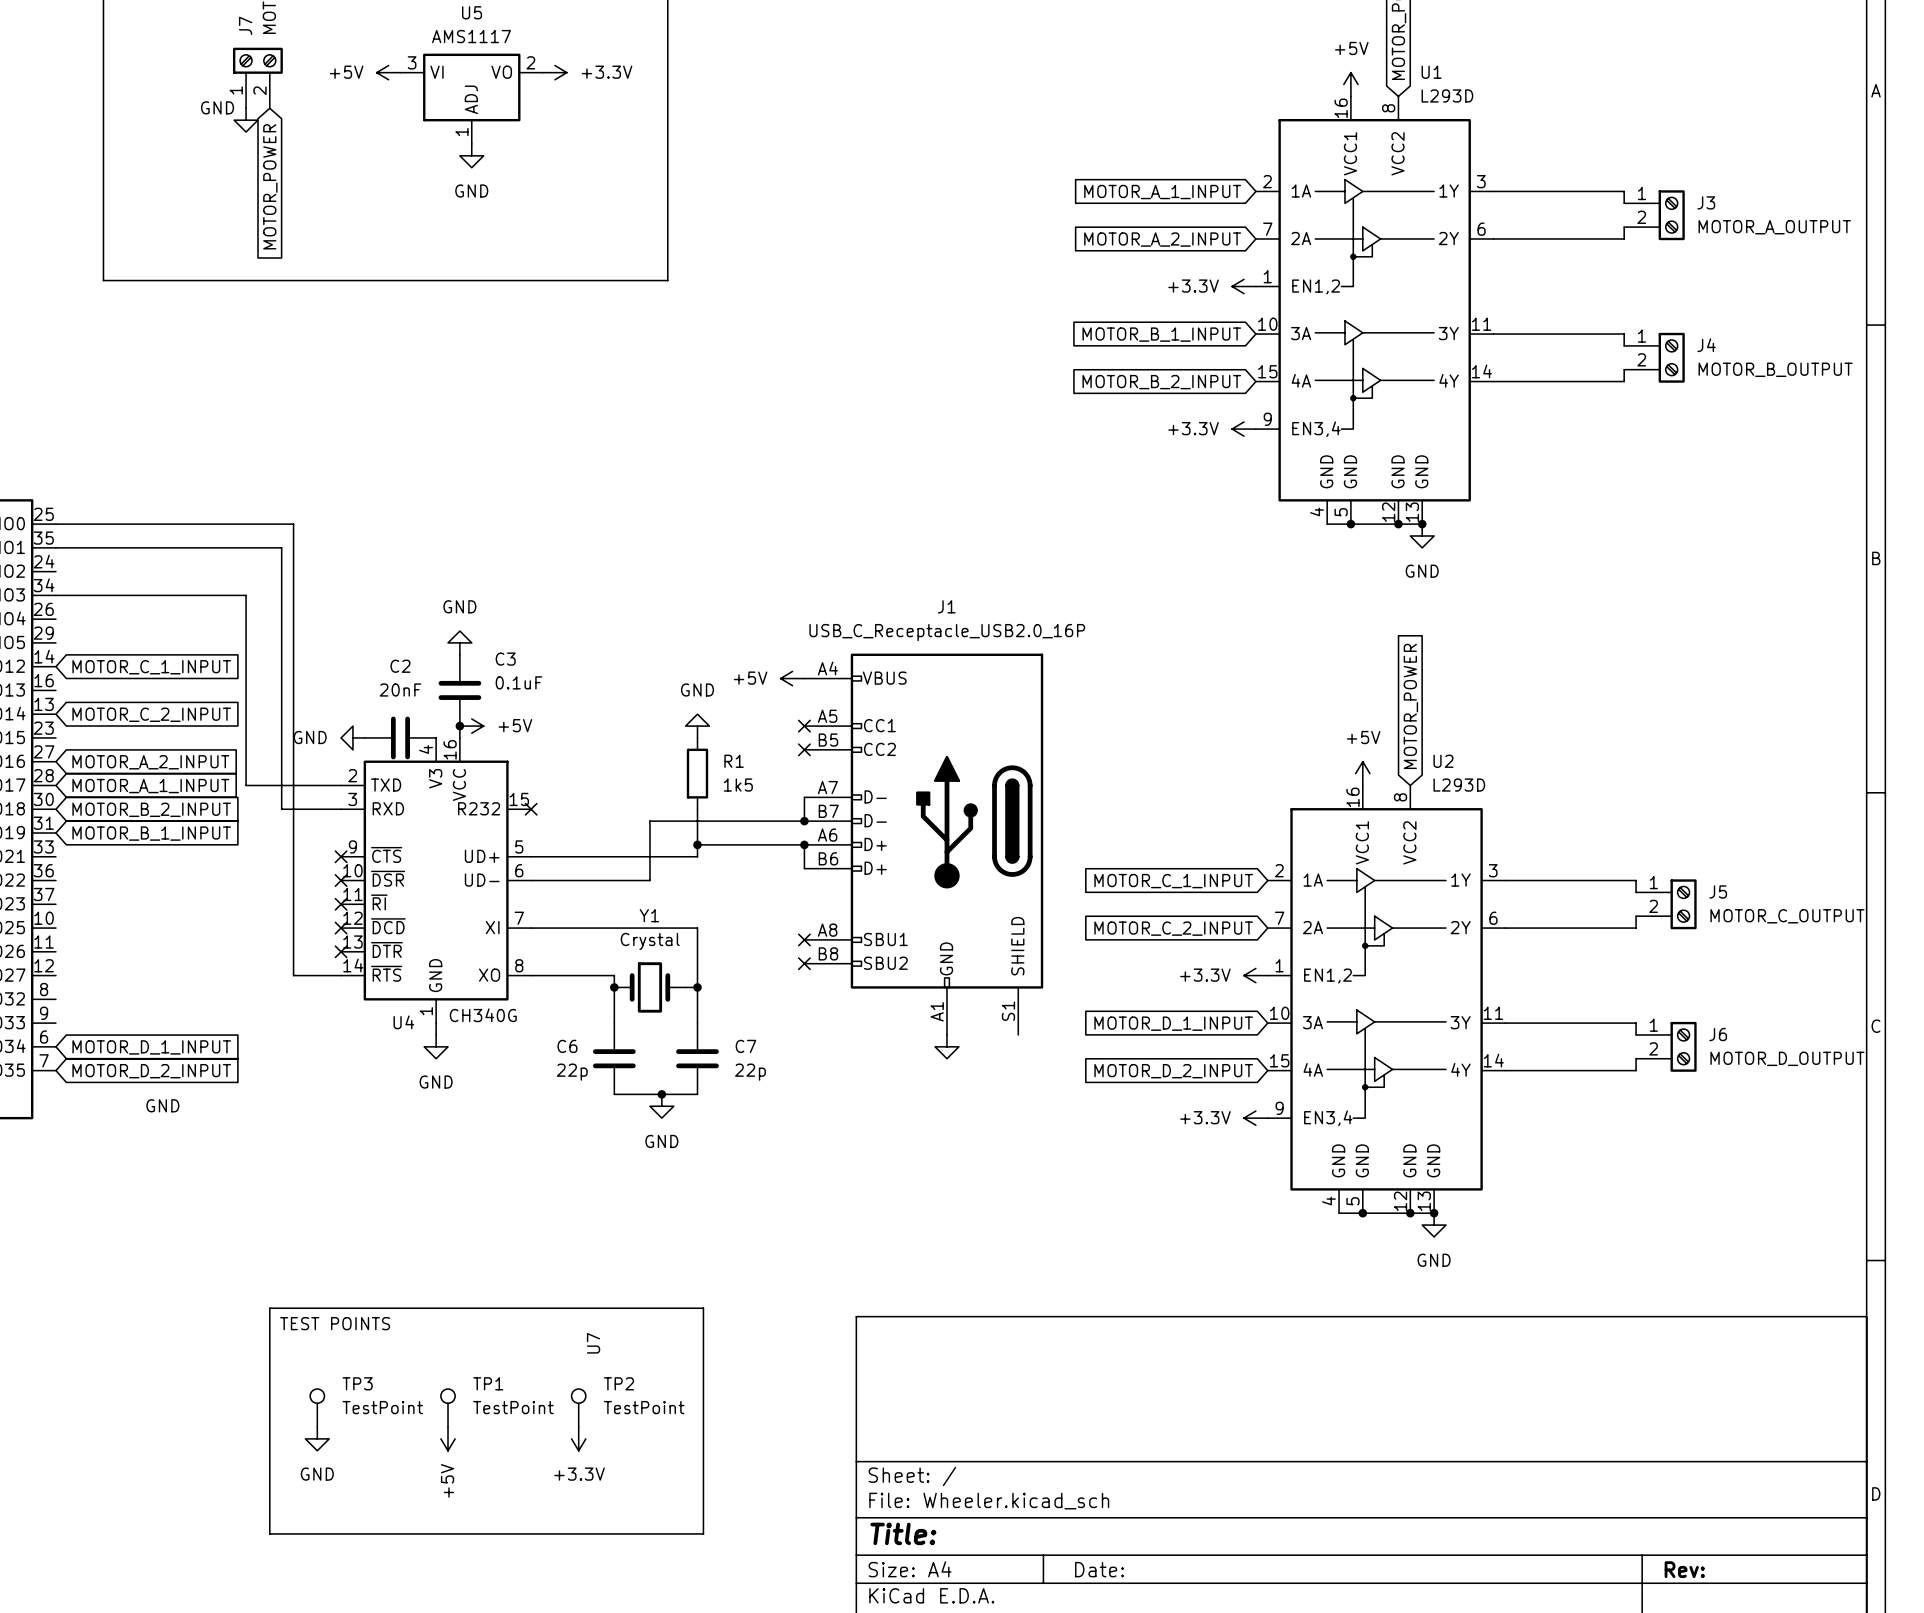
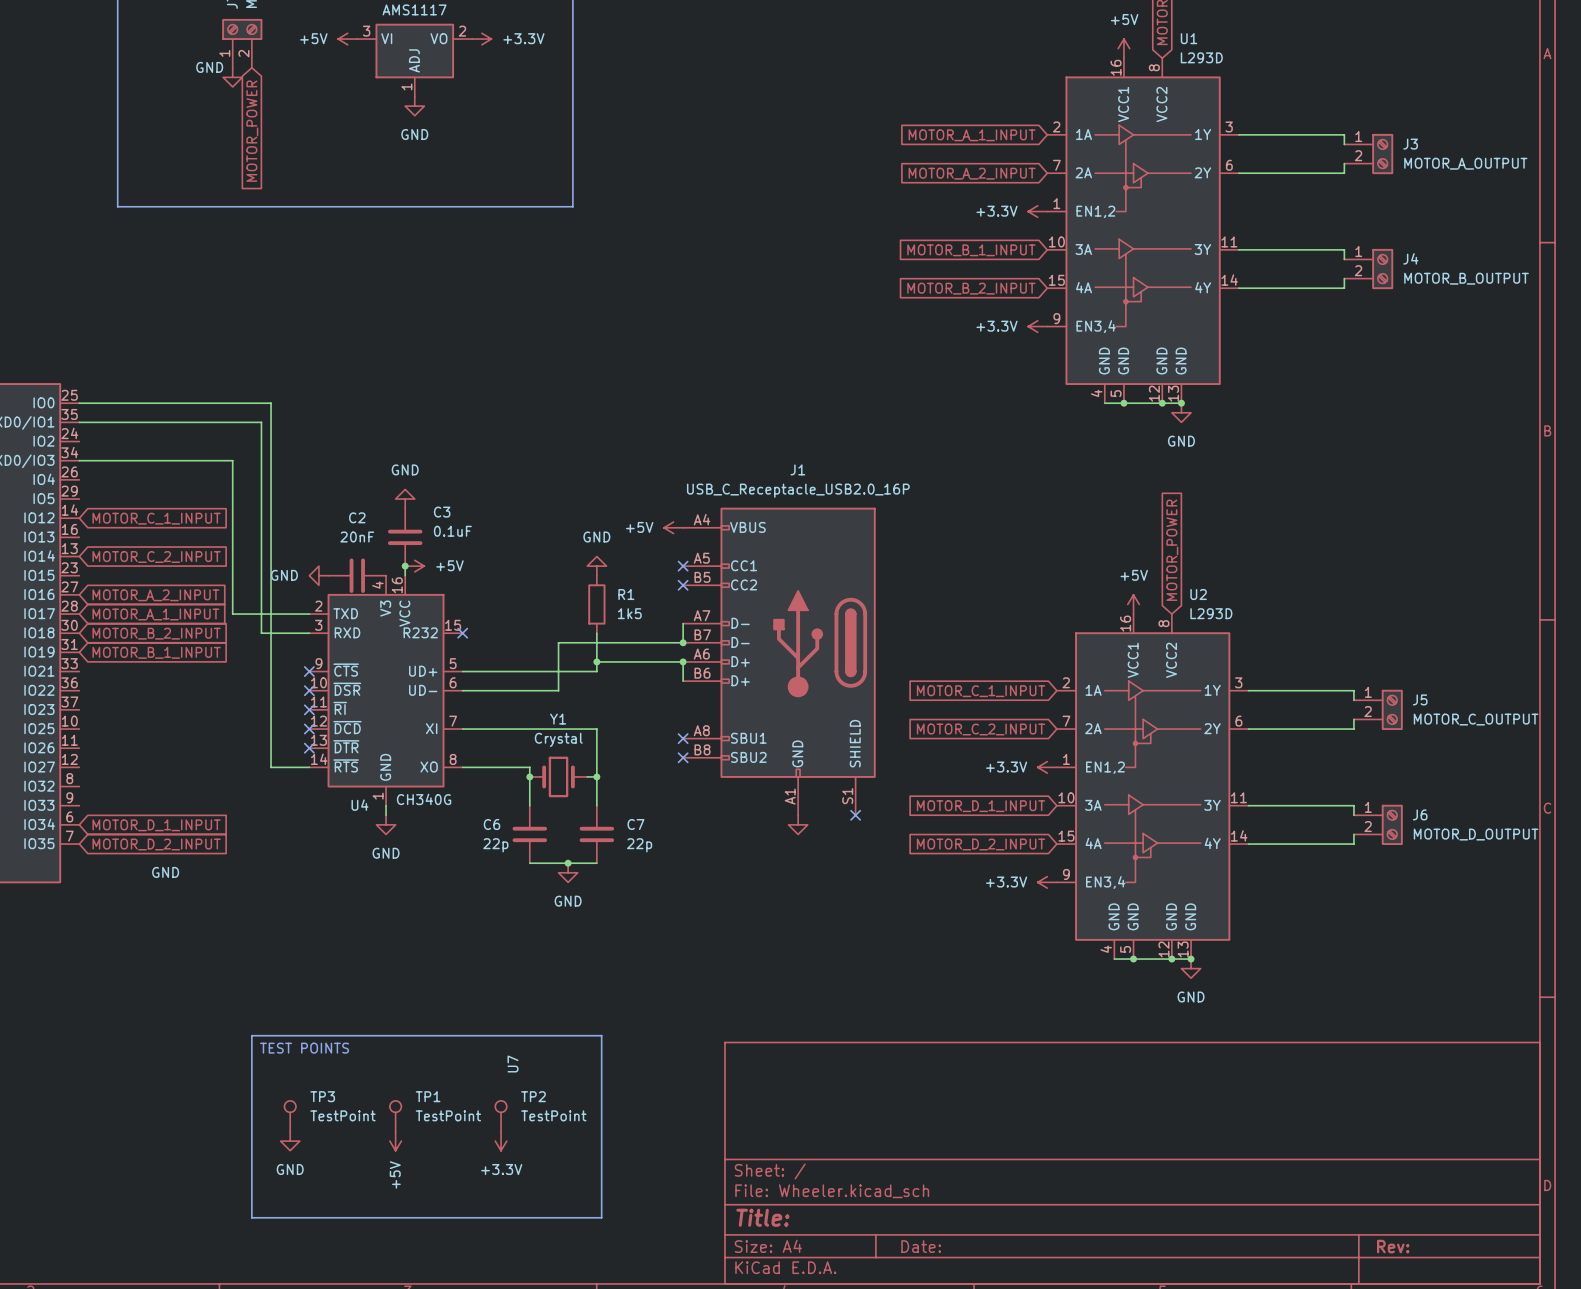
no-connect mark: none -> (855, 815)

